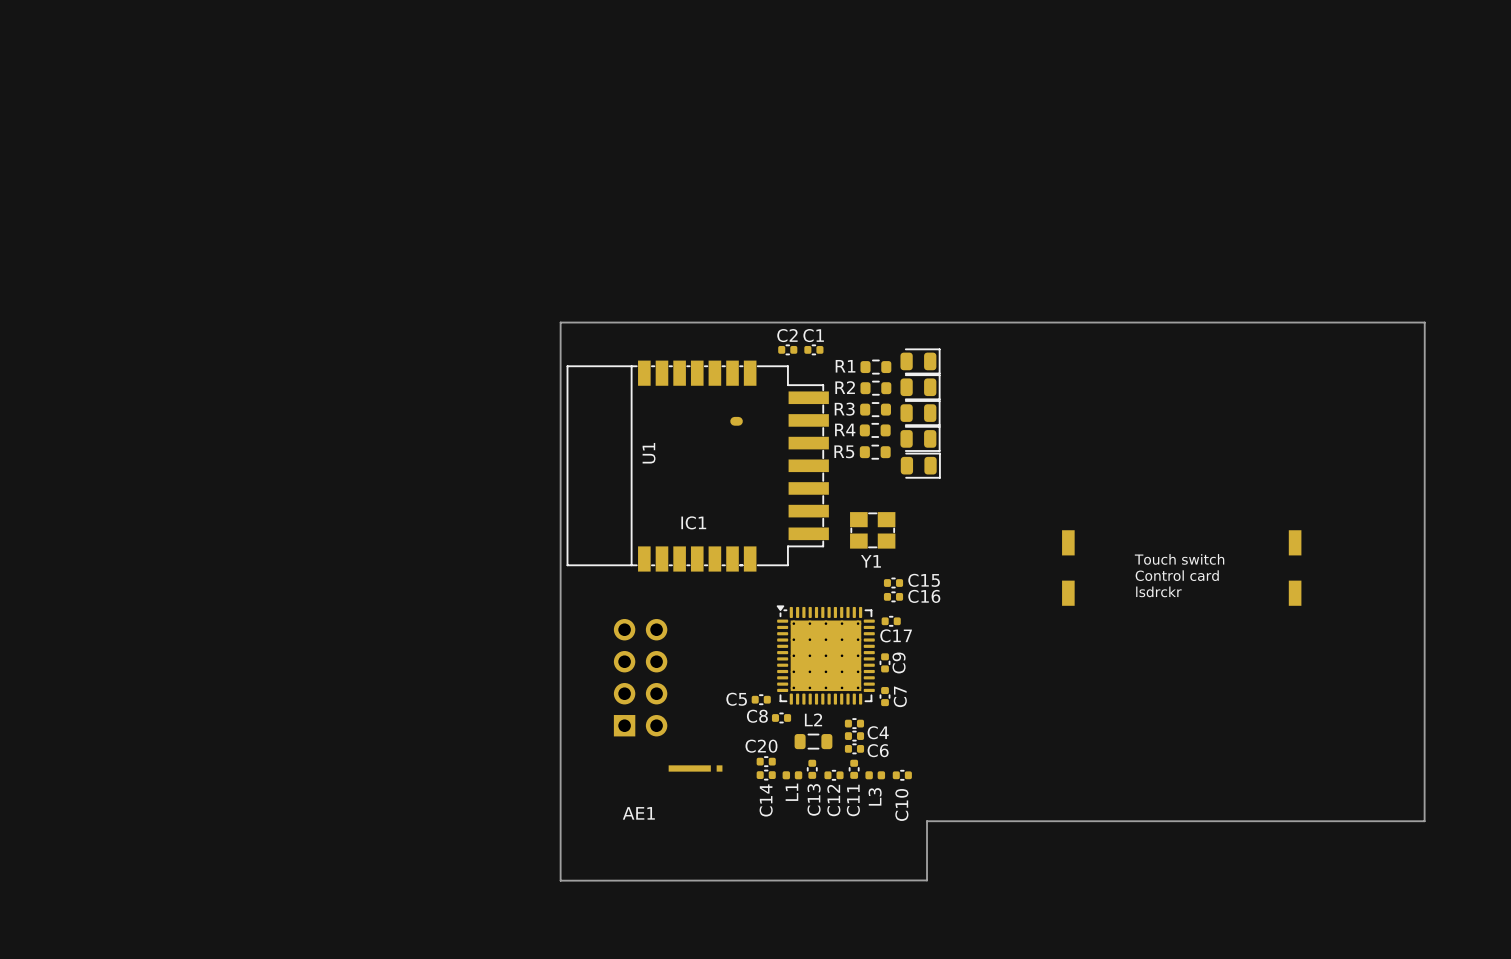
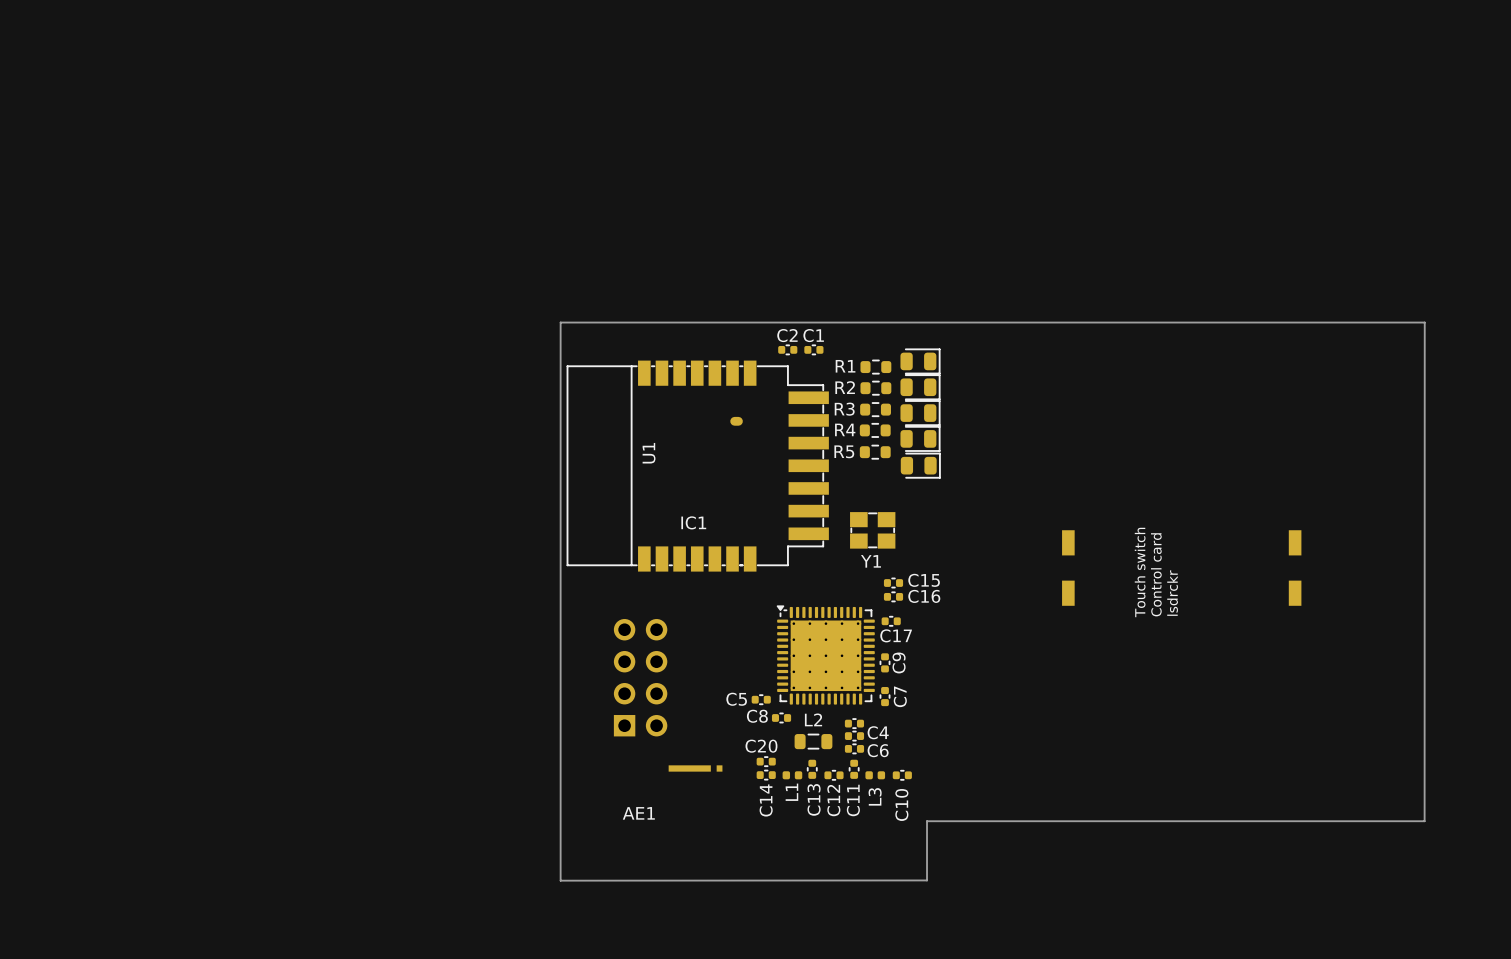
text rotation: 0° (1179, 559) -> 90° counterclockwise (1140, 572)
text rotation: 0° (1177, 575) -> 90° counterclockwise (1156, 574)
text rotation: 0° (1158, 591) -> 90° counterclockwise (1172, 593)

